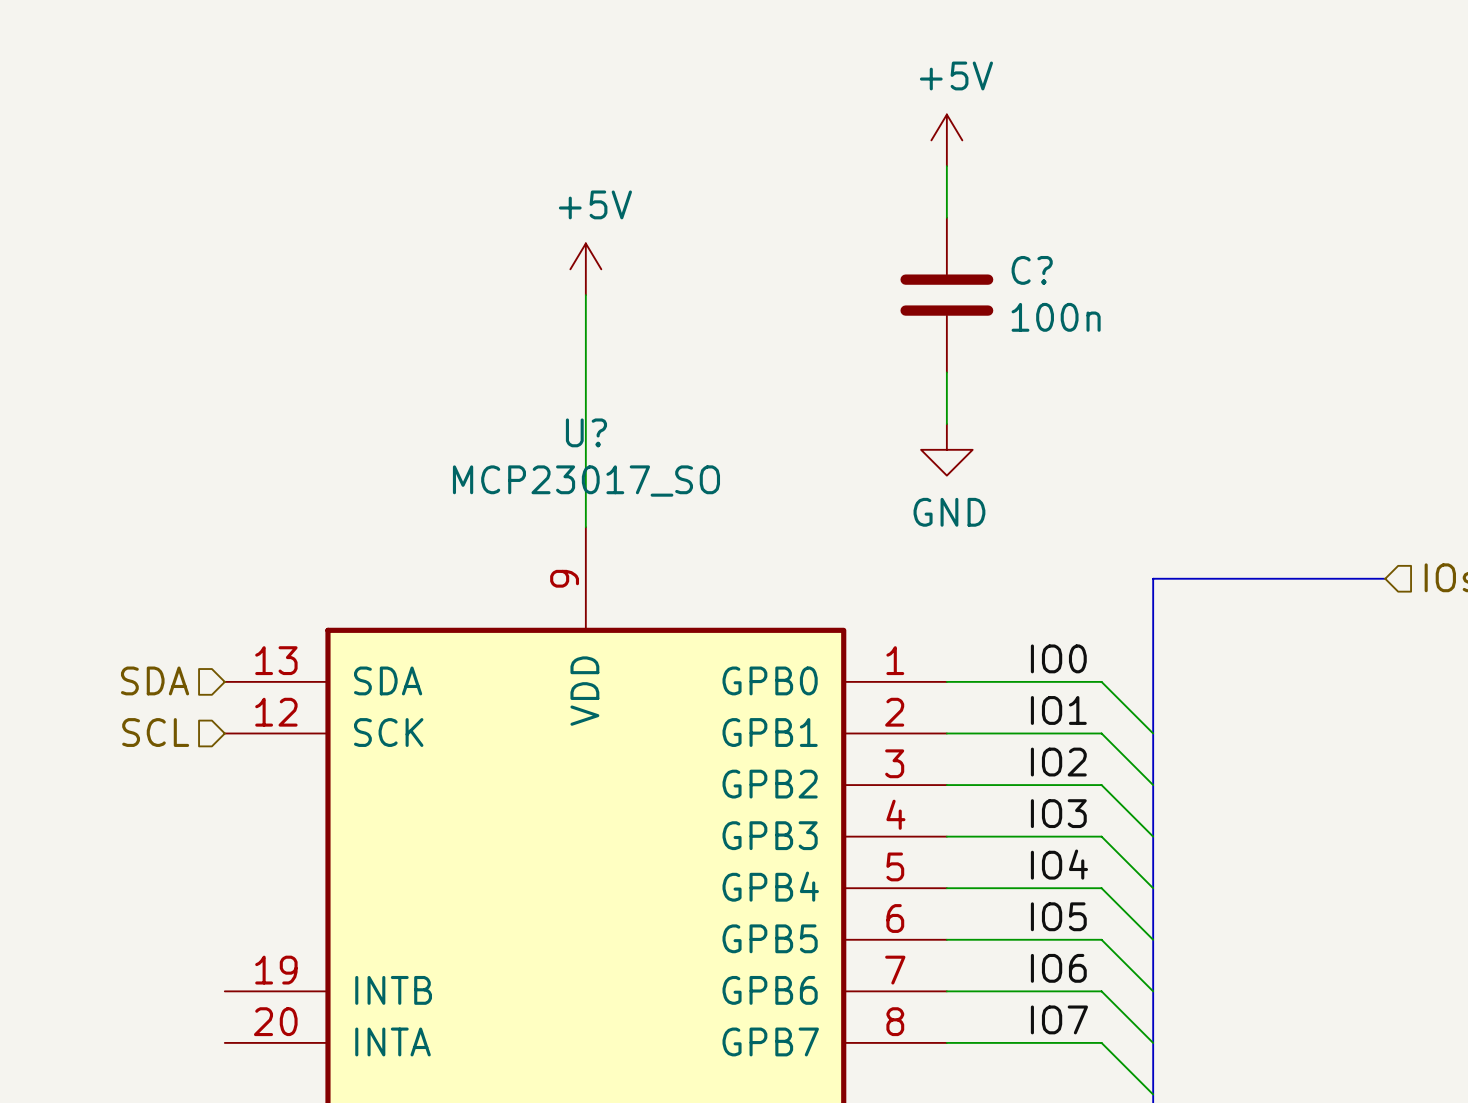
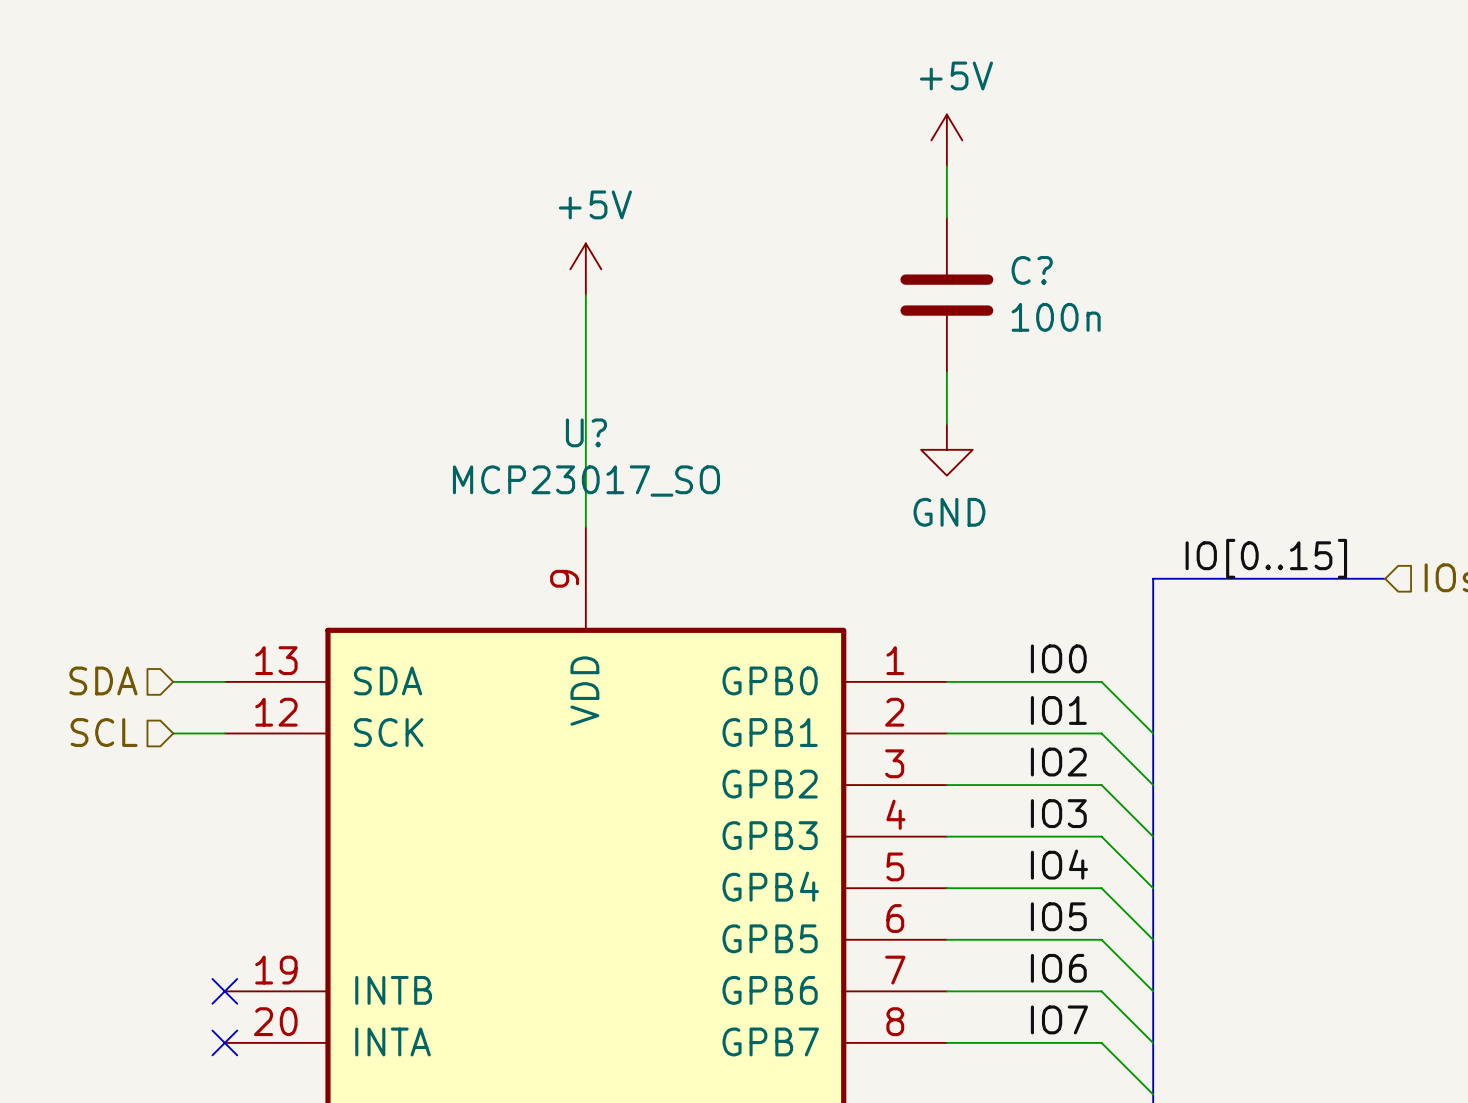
label: none -> IO[0..15] (1266, 558)
hierarchical label position: SDA (155, 680) -> SDA (103, 680)
wire: none -> (173, 681) (224, 681)
hierarchical label position: SCL (155, 732) -> SCL (104, 732)
wire: none -> (173, 733) (224, 733)
no-connect mark: none -> (224, 991)
no-connect mark: none -> (224, 1042)

